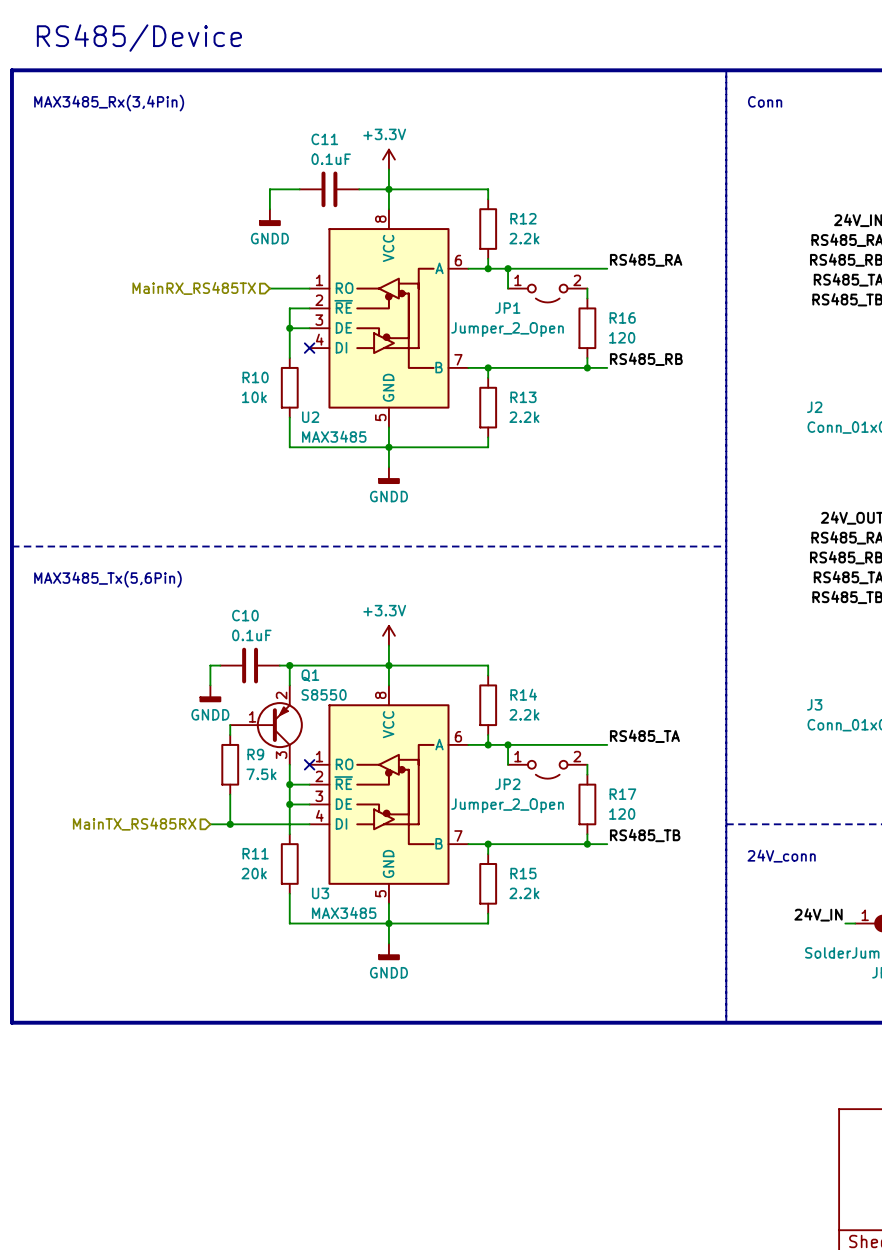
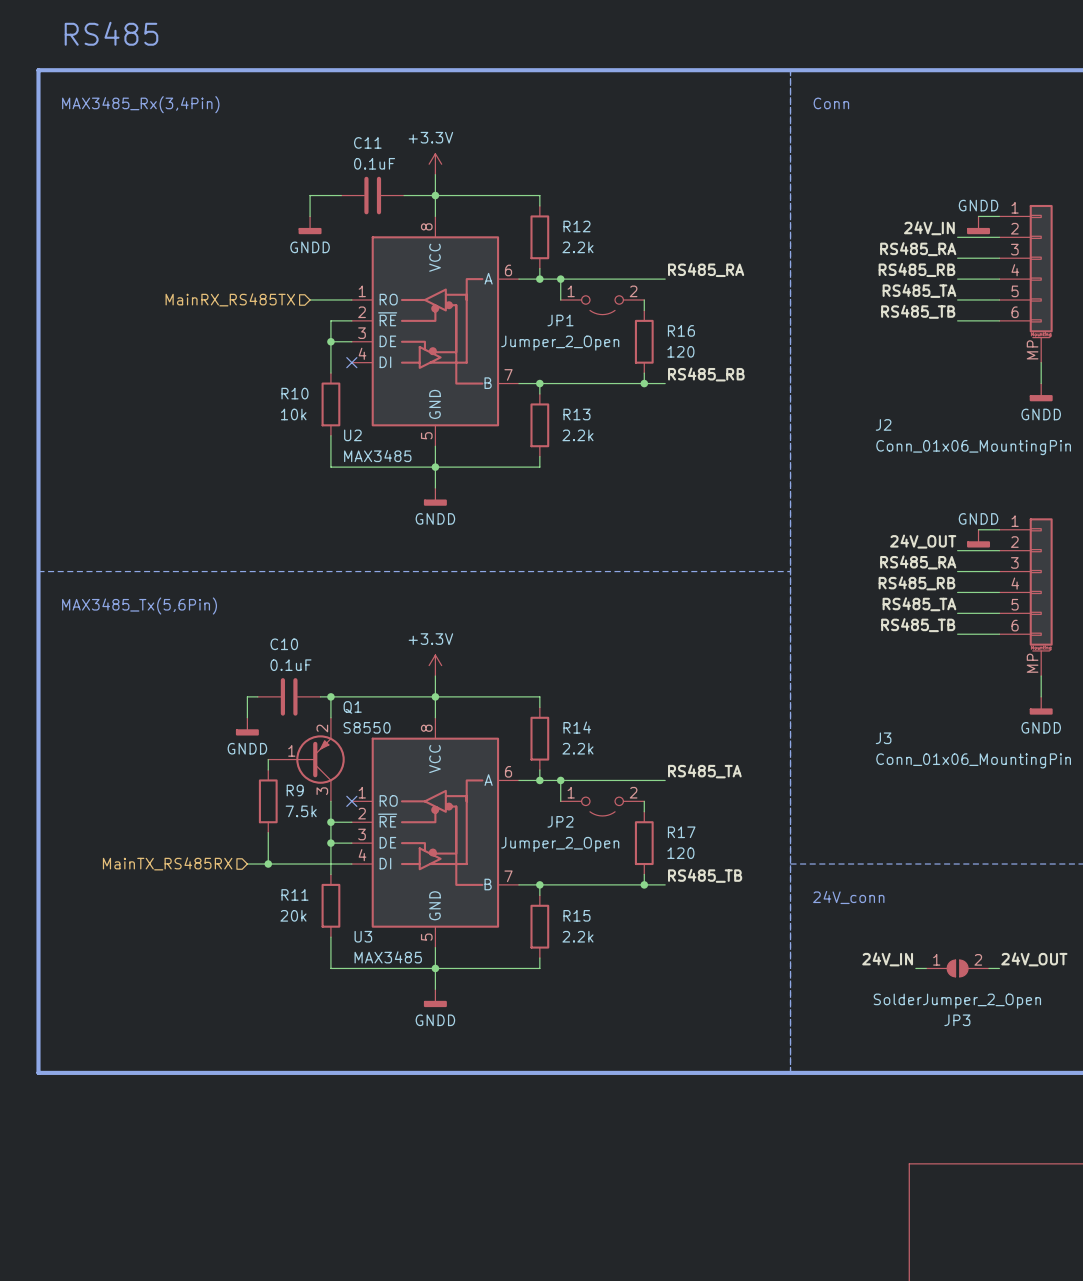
text: RS485/Device (139, 38) -> RS485 (111, 33)

